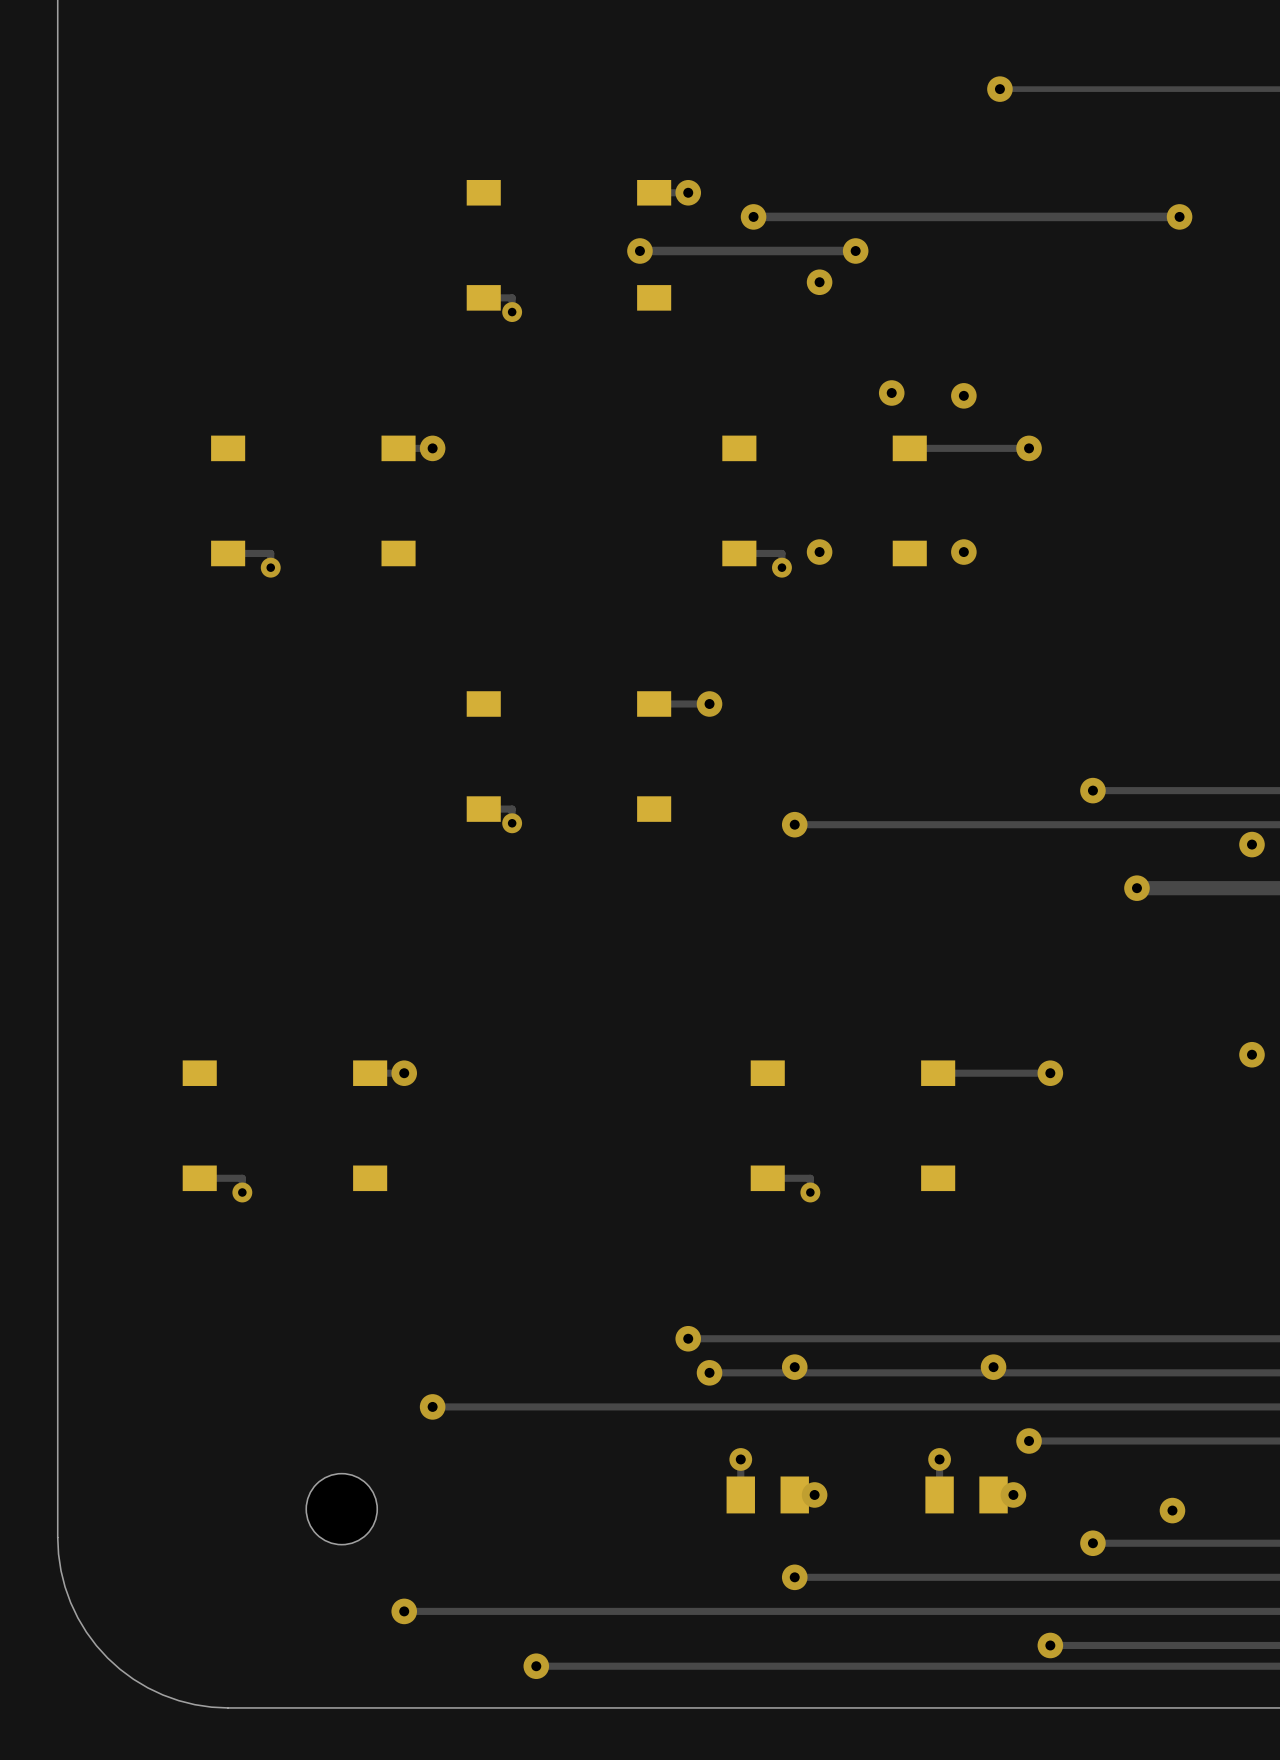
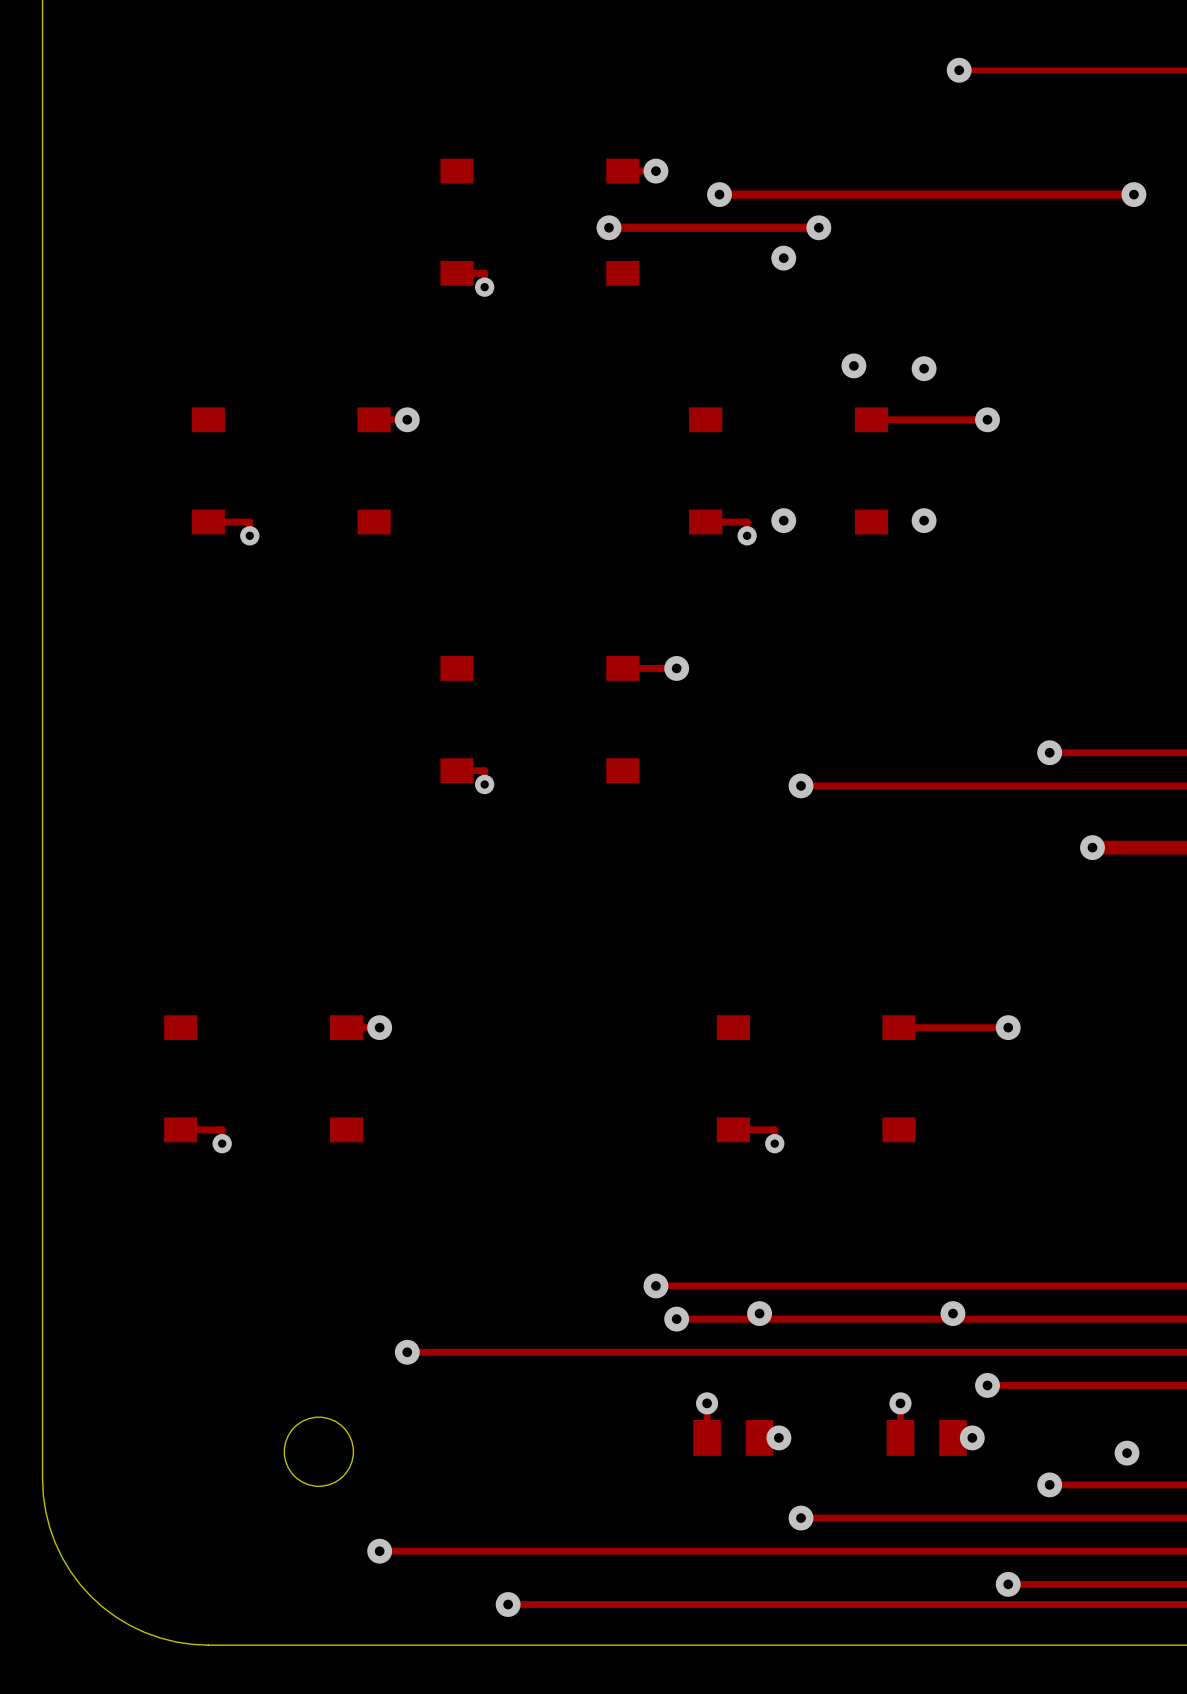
track: (794, 824) (837, 824) -> none
via position: (794, 824) -> (801, 785)
track: (794, 1577) (837, 1577) -> none
via position: (794, 1577) -> (801, 1518)

